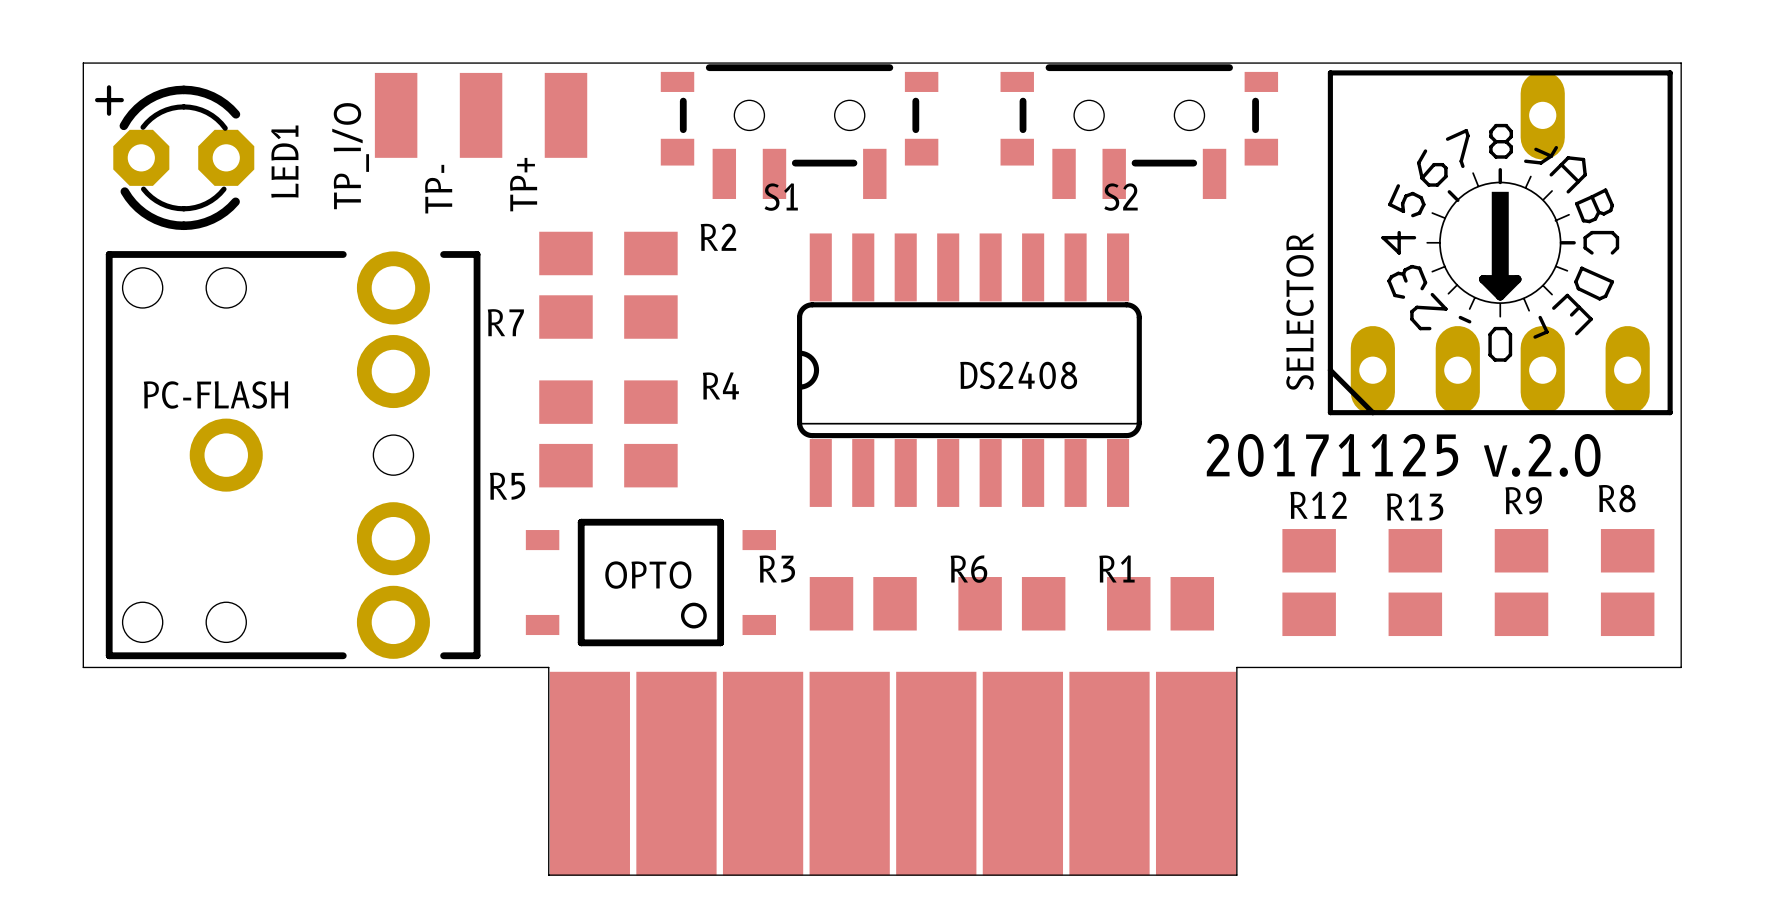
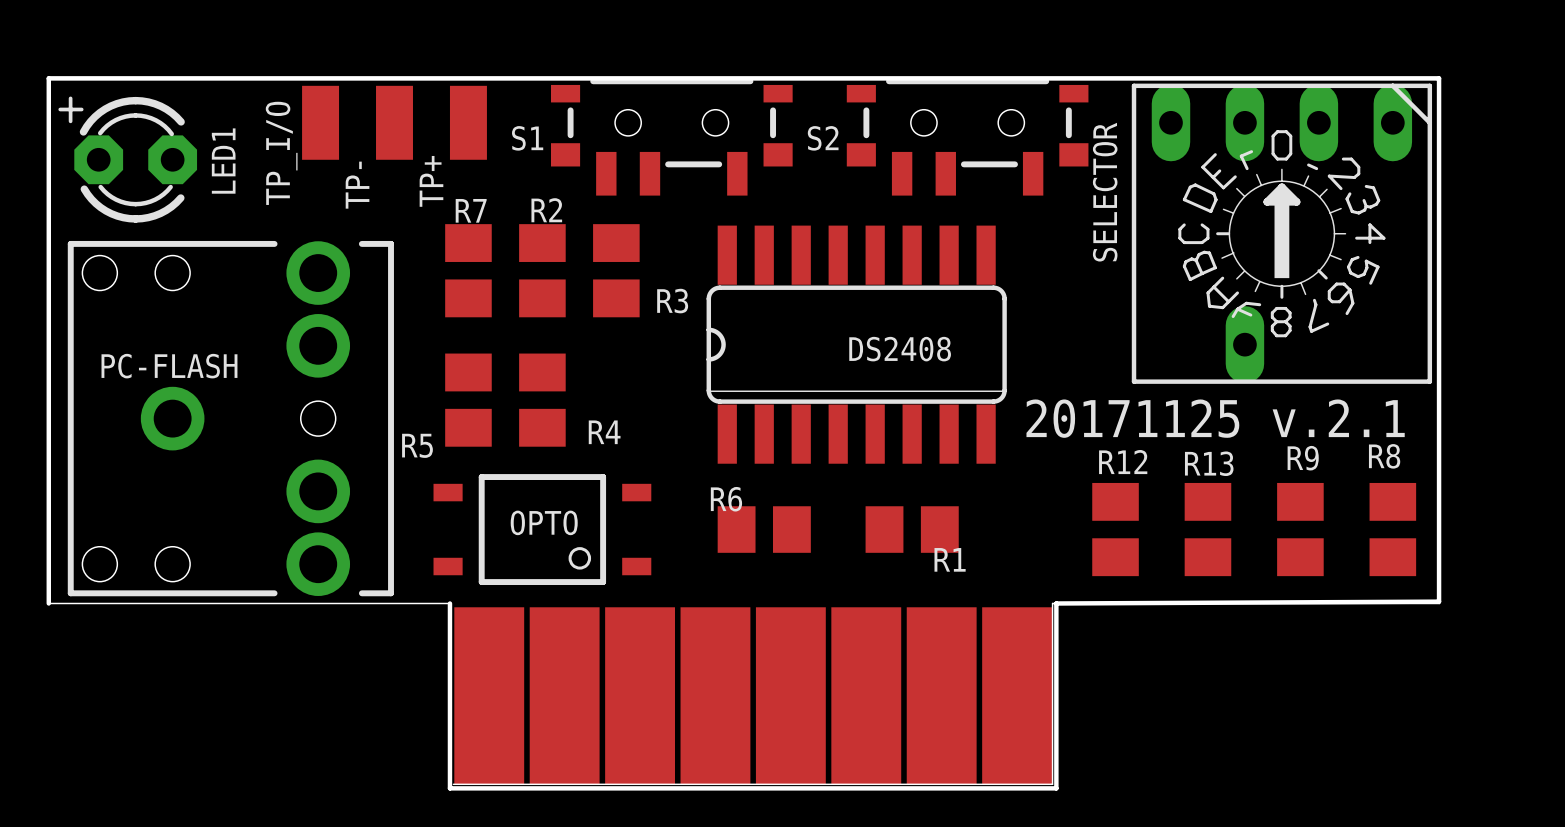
S1 name position: S1 (781, 197) -> S1 (527, 138)
S2 name position: S2 (1121, 197) -> S2 (823, 138)
R2 name position: R2 (718, 237) -> R2 (546, 210)
SELECTOR rotation: 0° (1500, 242) -> 180° (1281, 233)
R7 name position: R7 (505, 322) -> R7 (471, 210)
DS2408 position: (969, 370) -> (856, 344)
R4 name position: R4 (720, 385) -> R4 (604, 432)
text: 20171125 v.2.0 (1403, 455) -> 20171125 v.2.1 (1215, 418)
R1 name position: R1 (1116, 568) -> R1 (950, 559)
R3 name position: R3 (777, 569) -> R3 (672, 301)
R3 rotation: 0° (863, 603) -> 90° clockwise (616, 270)
R3 position: (863, 603) -> (616, 270)
R6 position: (1011, 603) -> (764, 529)
R1 position: (1160, 603) -> (912, 529)
board edge: (544, 667) (548, 667) (548, 875) -> (449, 603) (449, 788) (1056, 788) (1056, 603) (1439, 601) (1439, 78) (48, 78) (48, 603)

